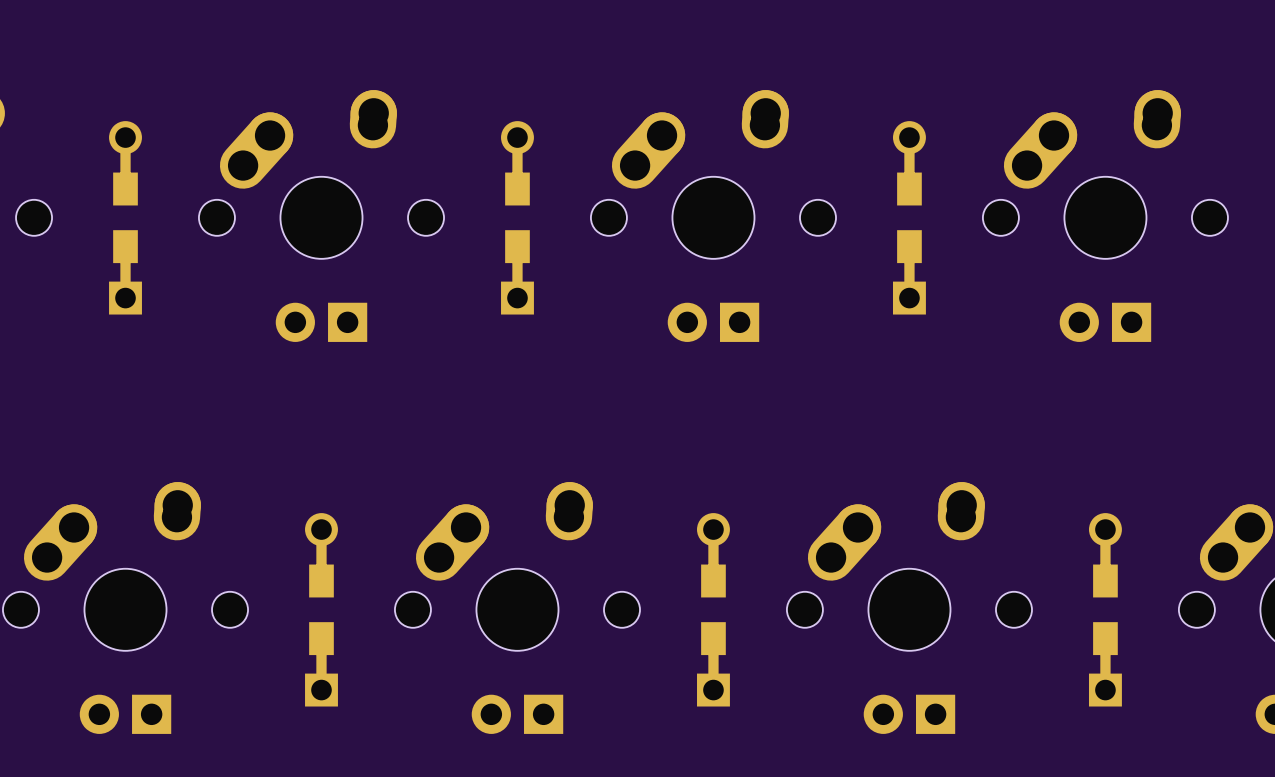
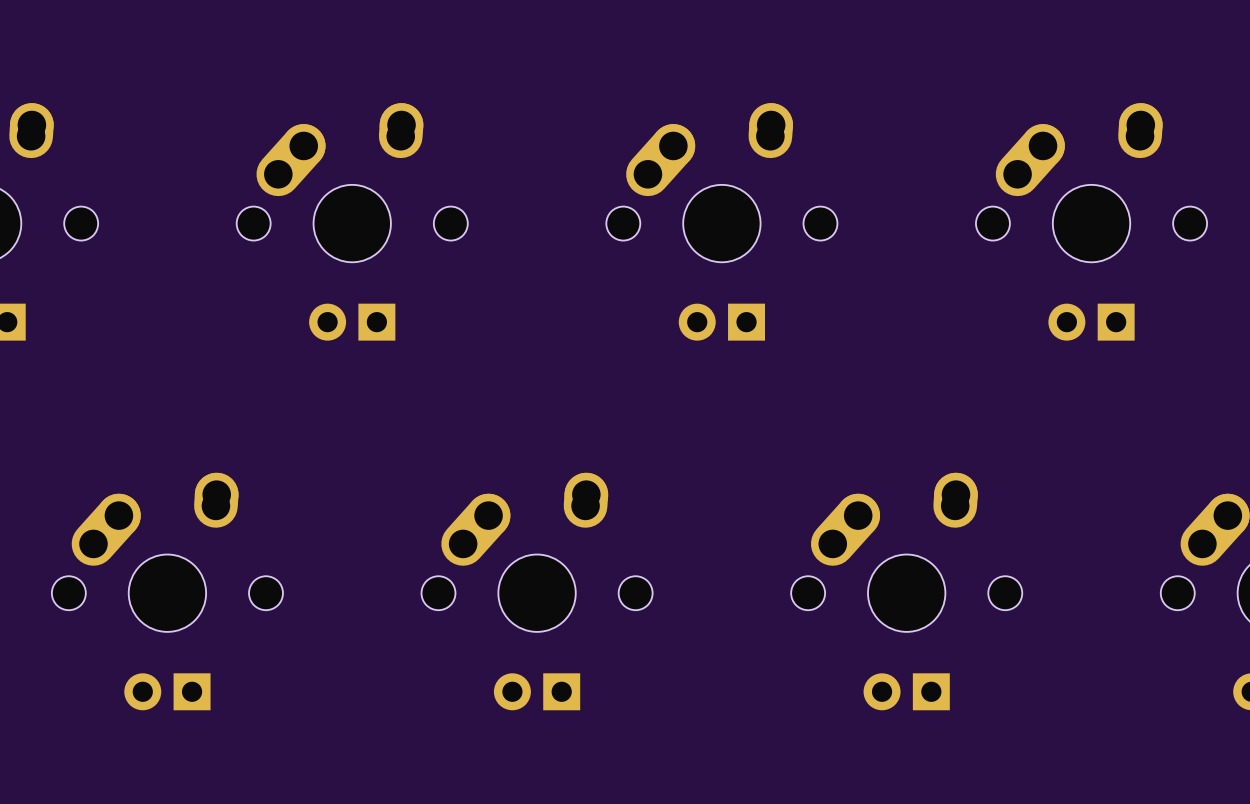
part: (125, 217) -> none
part: (517, 217) -> none
part: (909, 217) -> none
part: (321, 609) -> none
part: (713, 609) -> none
part: (1105, 609) -> none

